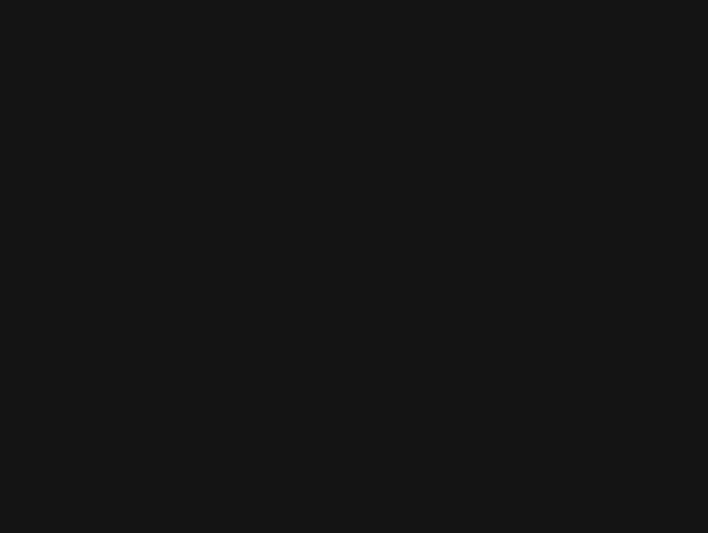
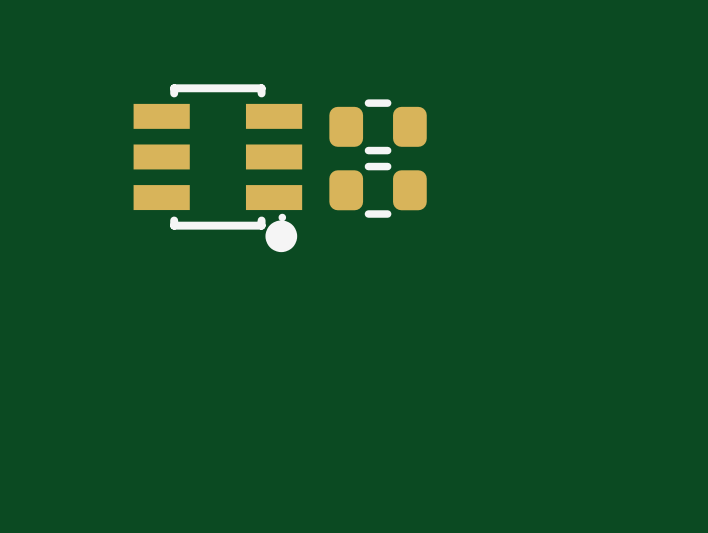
part: none -> (378, 126)
part: none -> (217, 168)
part: none -> (378, 190)

